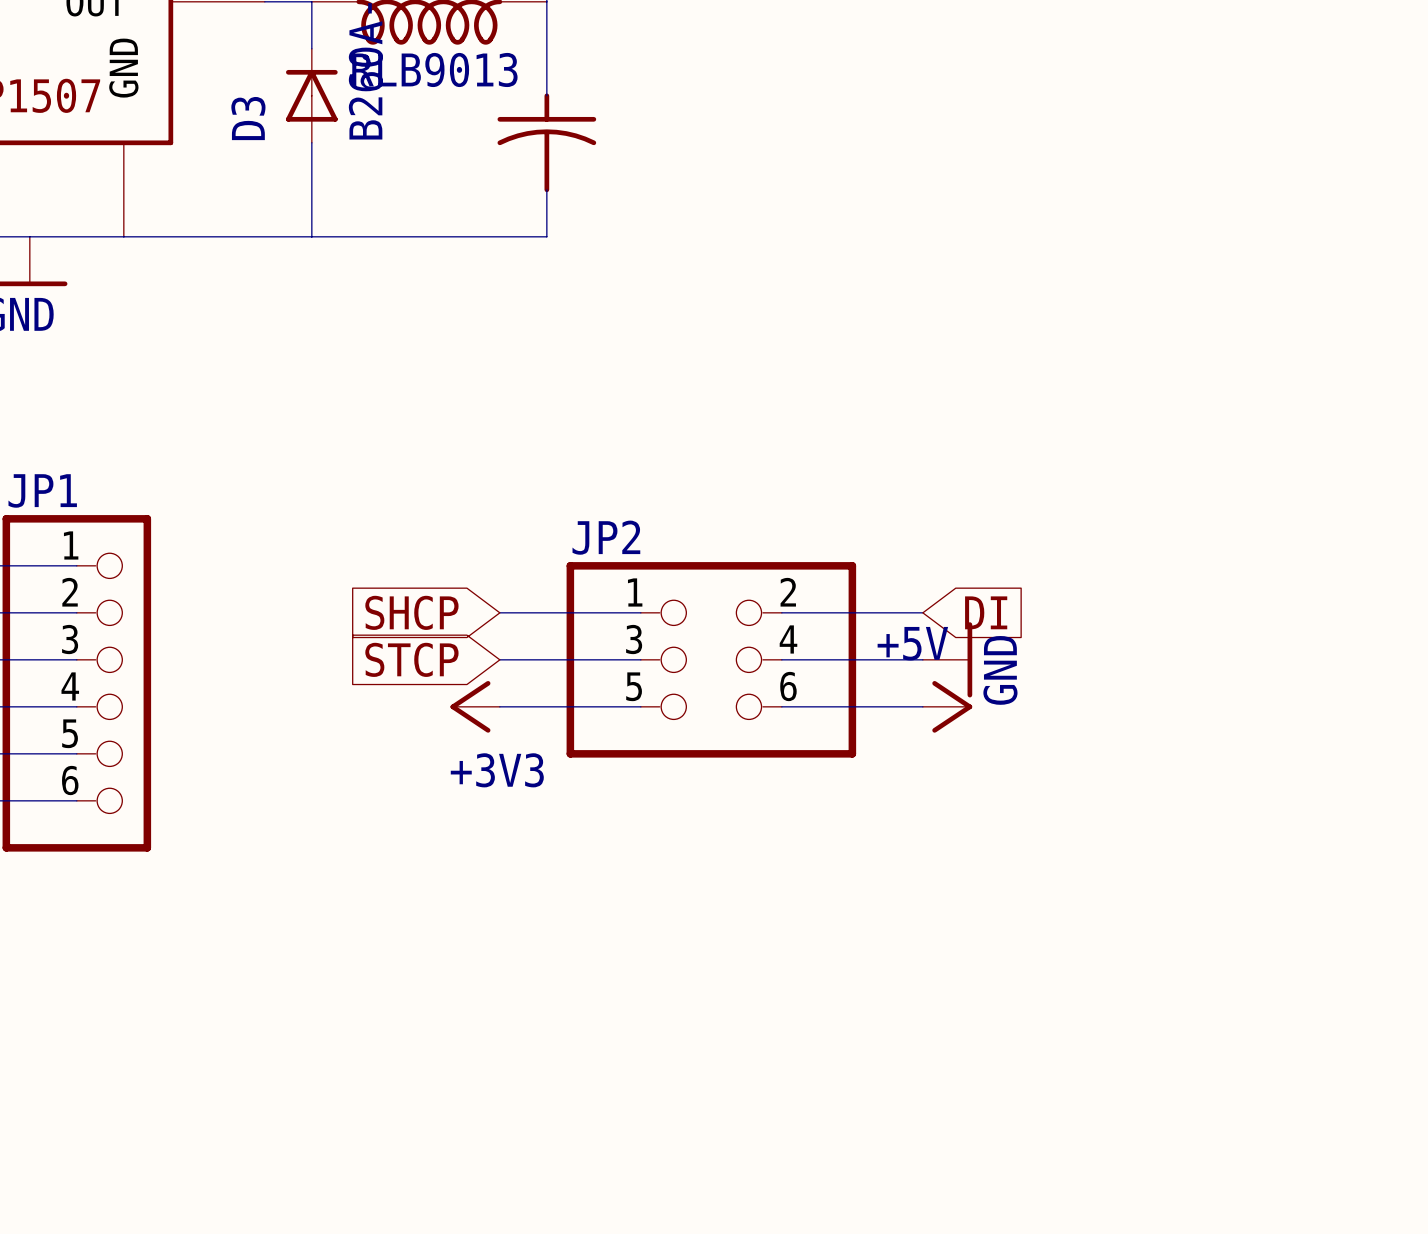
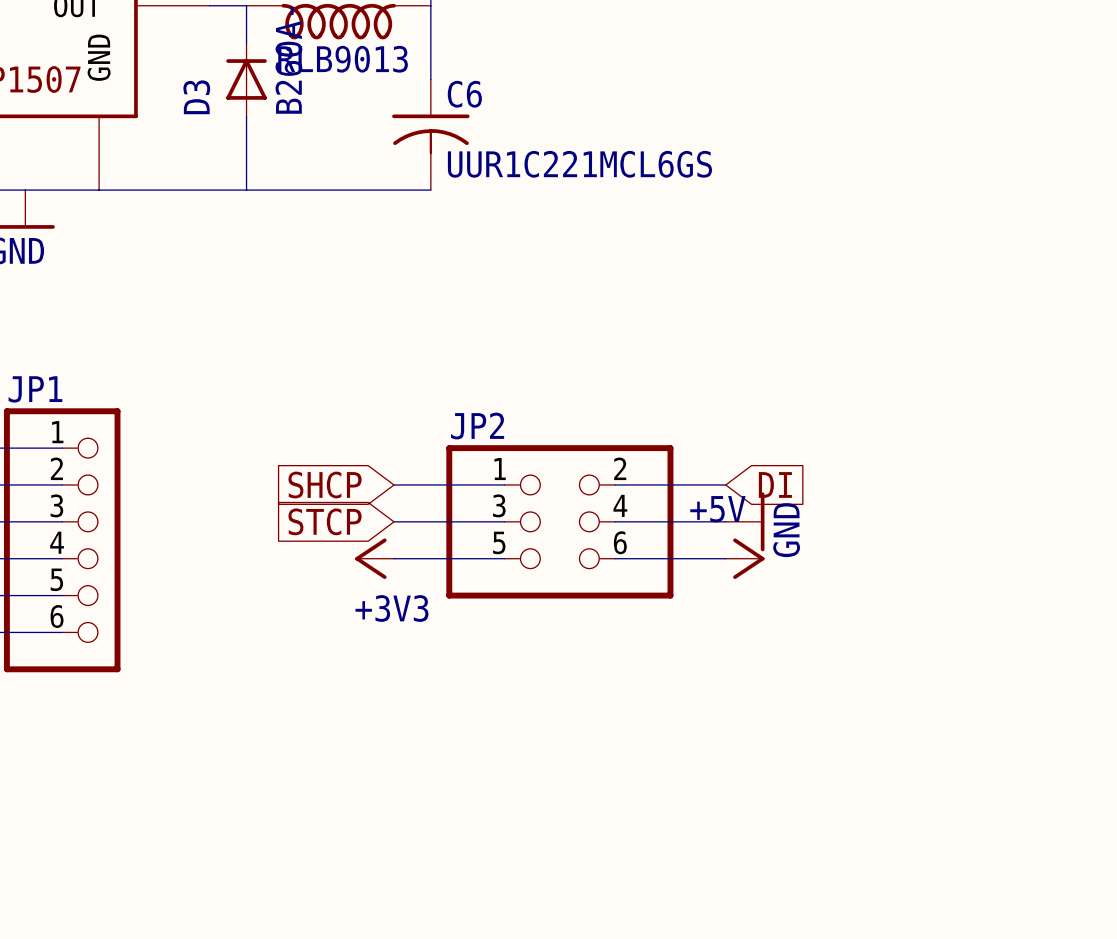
part: (546, 142) -> none
C6: none -> UUR1C221MCL6GS (430, 134)

